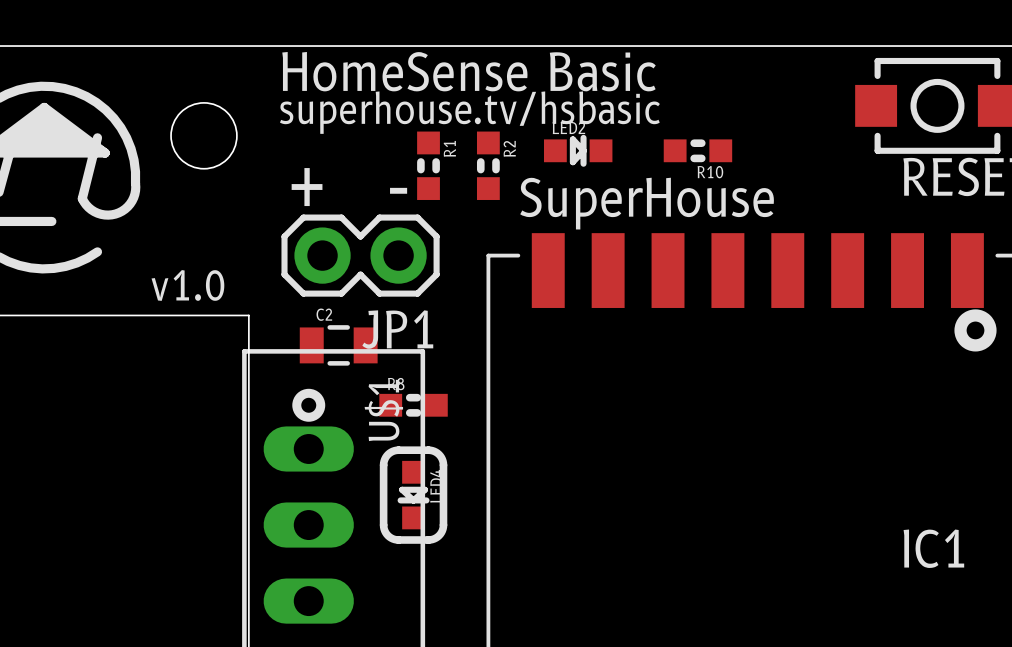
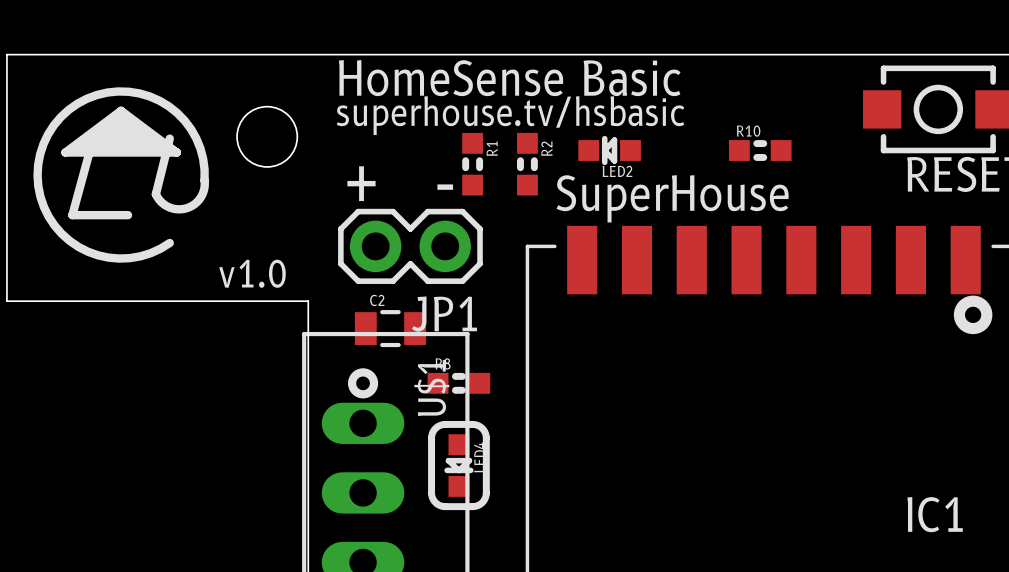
LED2 rotation: 0° (578, 150) -> 180° (609, 150)
R10 position: (697, 150) -> (760, 150)
R10 name position: R10 (710, 172) -> R10 (748, 131)

